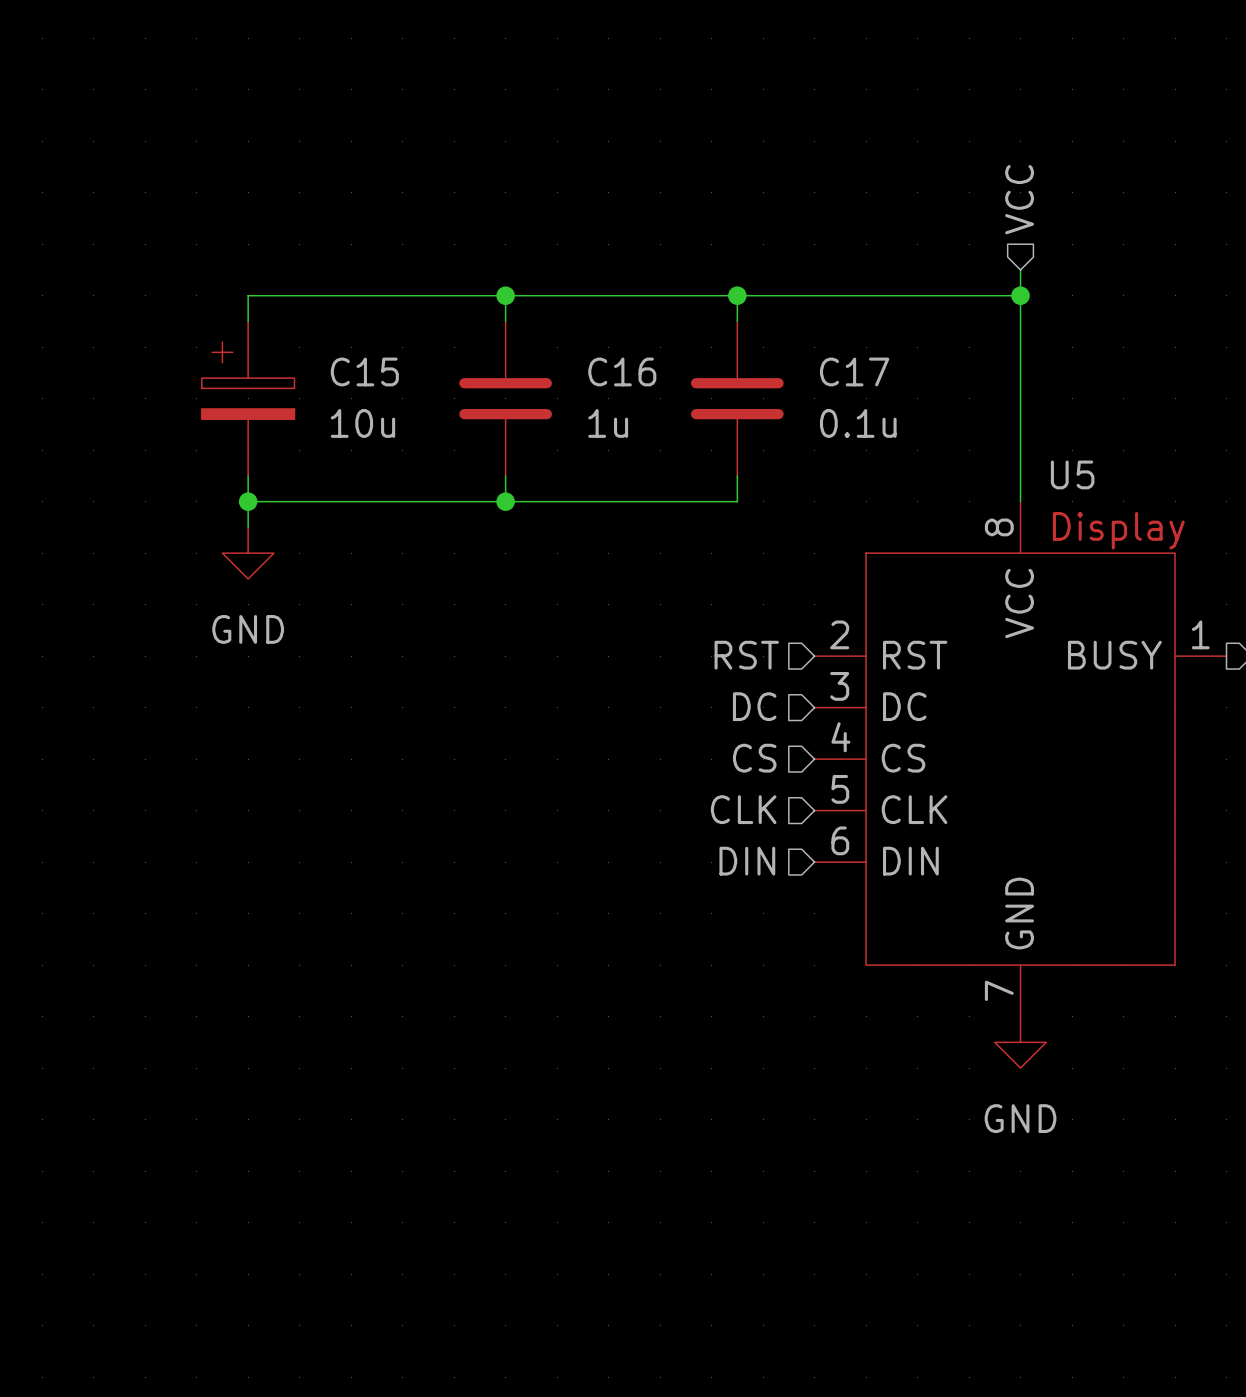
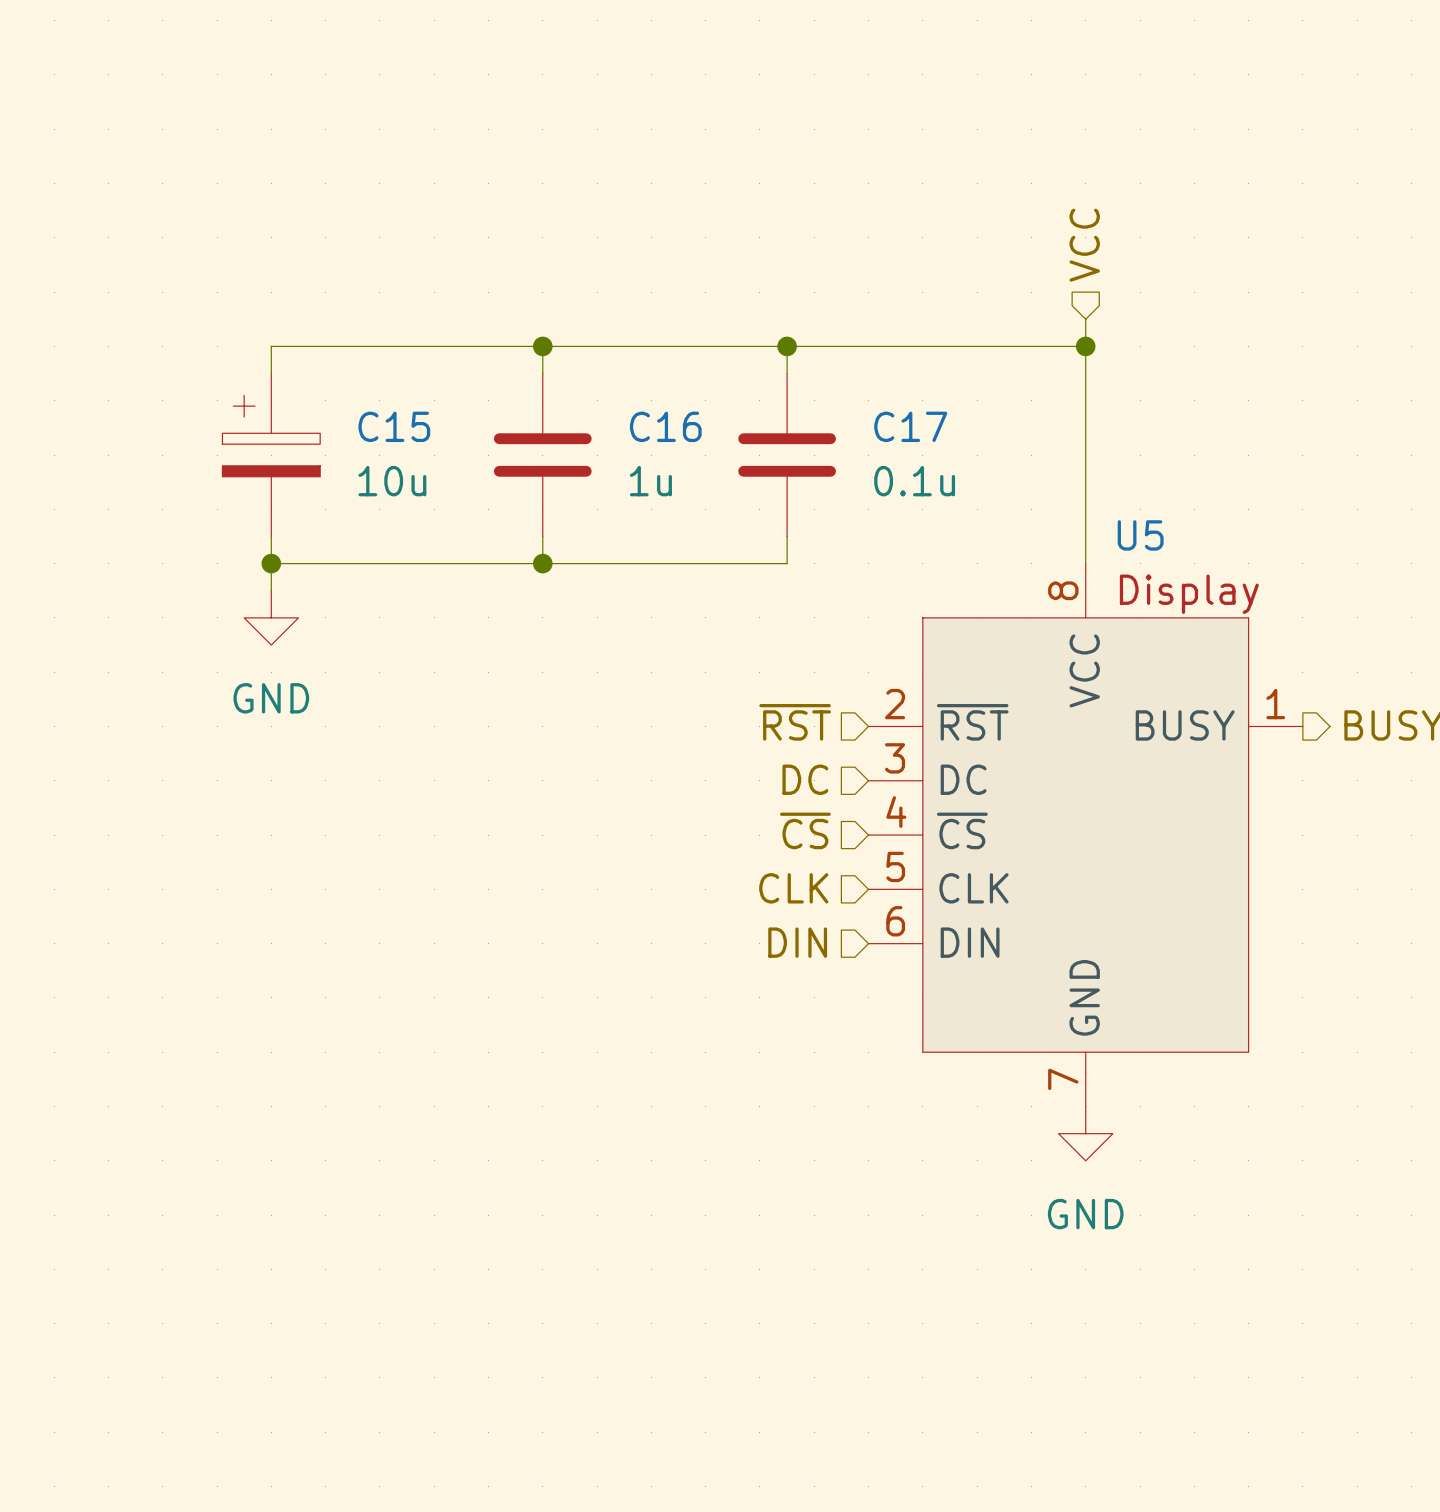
hierarchical label: RST (746, 655) -> ~{RST} (795, 722)
U5 pin name: RST (915, 655) -> ~{RST} (972, 722)
hierarchical label: CS (754, 758) -> ~{CS} (805, 830)
U5 pin name: CS (903, 758) -> ~{CS} (962, 830)

